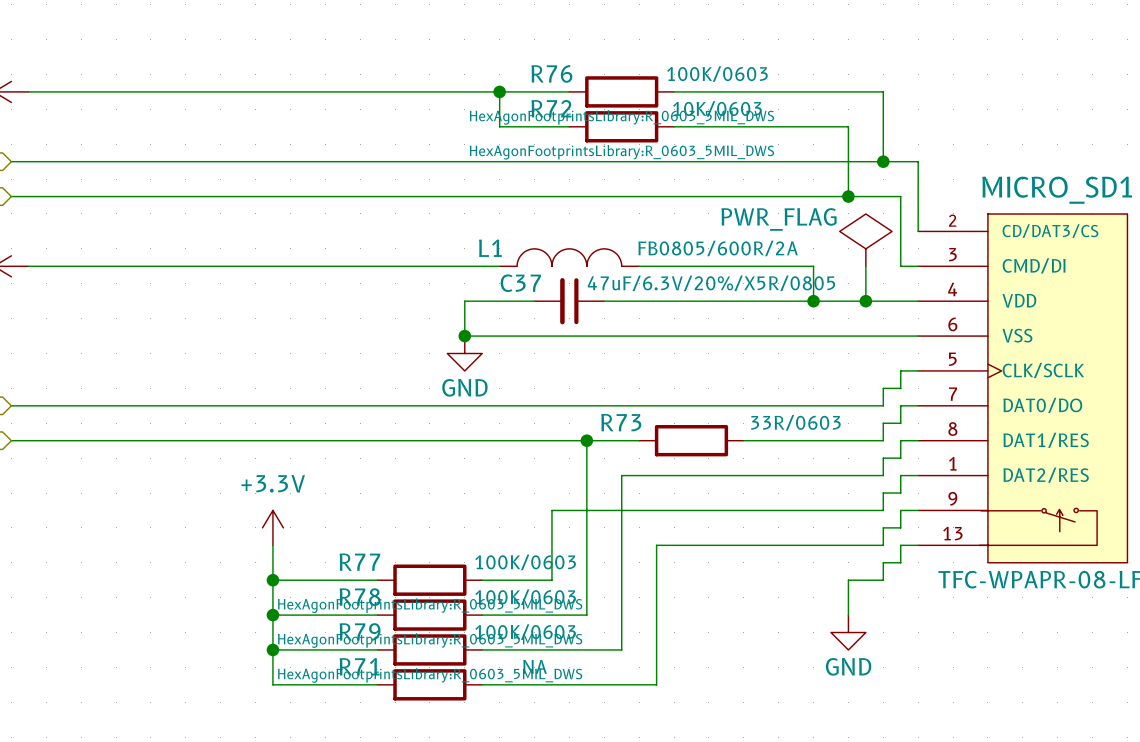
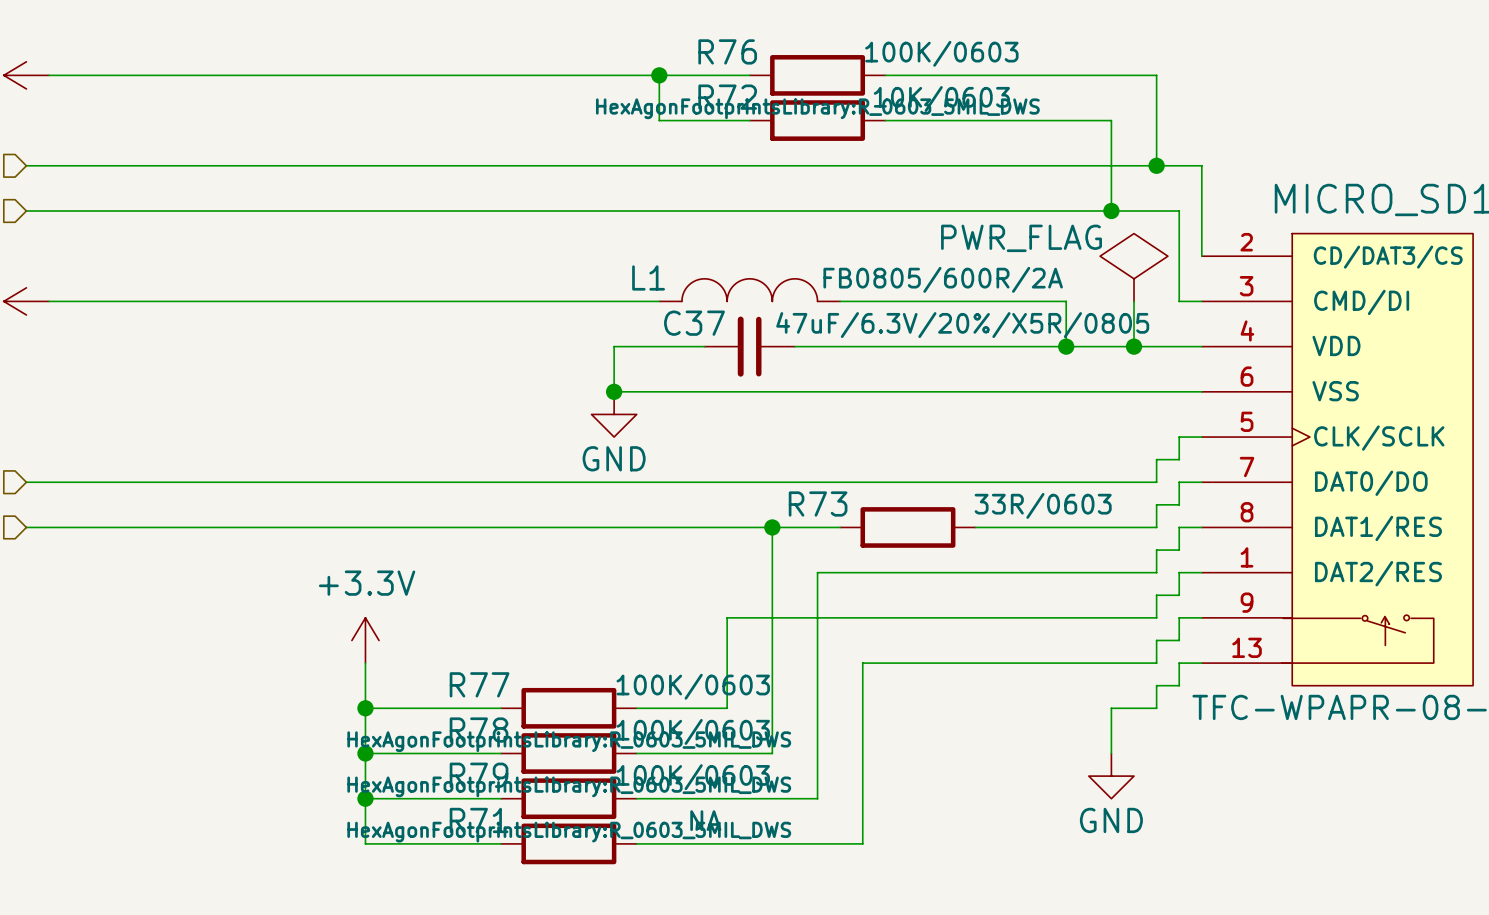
R72 text: HexAgonFootprintsLibrary:R_0603_5MIL_DWS (621, 152) -> none

